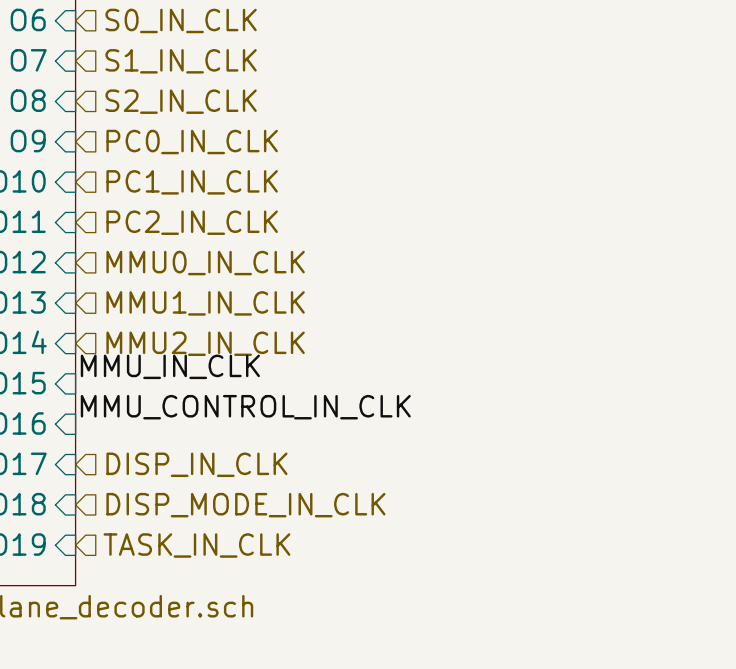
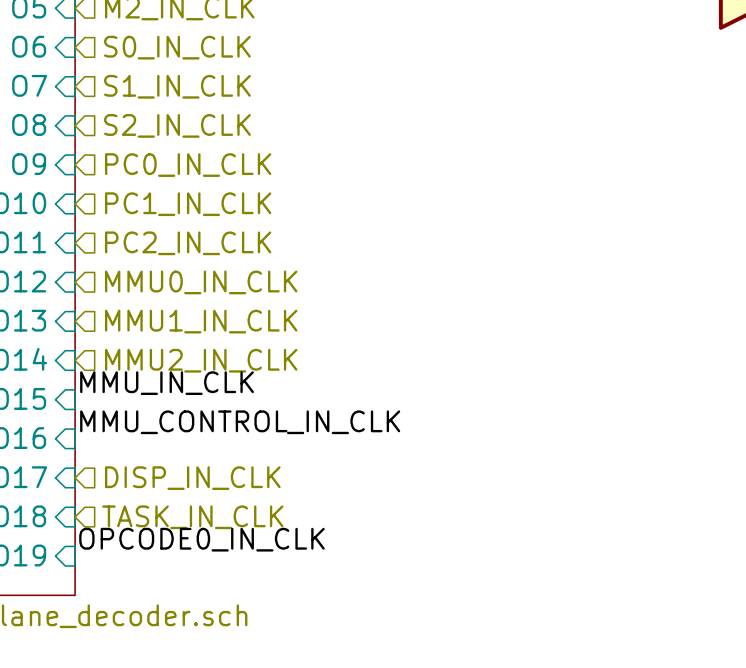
hierarchical label: DISP_MODE_IN_CLK (245, 505) -> TASK_IN_CLK (192, 517)
label: none -> OPCODE0_IN_CLK (201, 539)
hierarchical label: TASK_IN_CLK (196, 545) -> none

